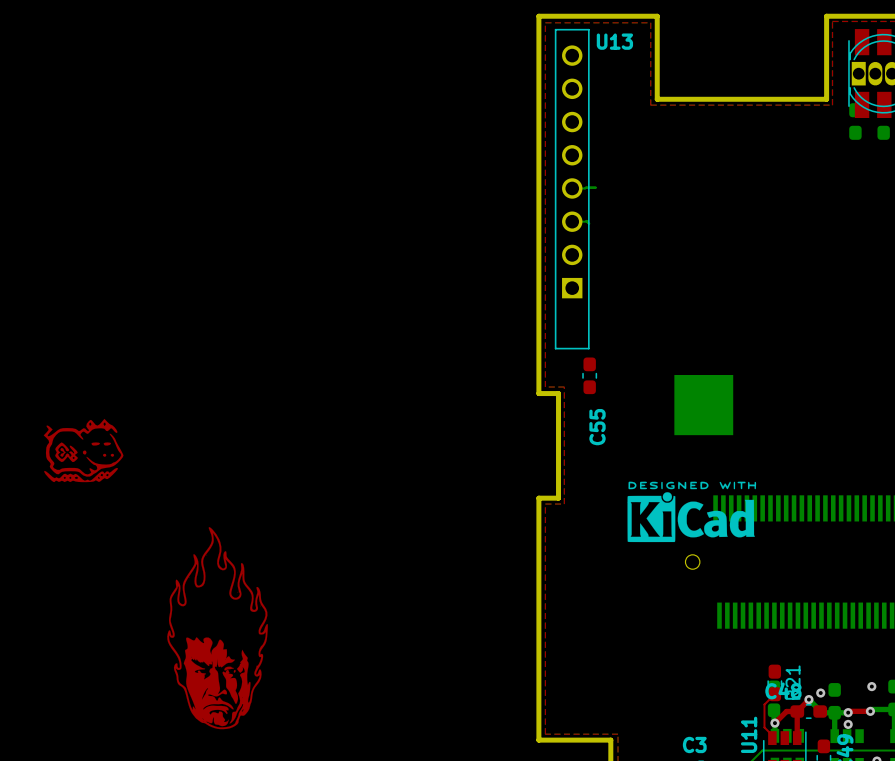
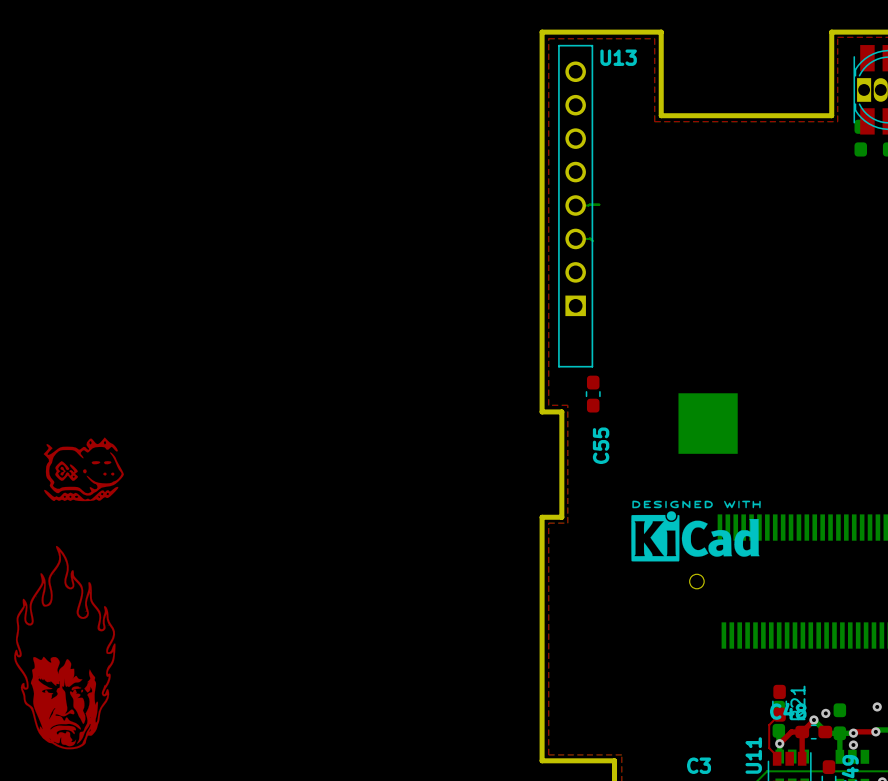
drawing position: (217, 628) -> (64, 647)

